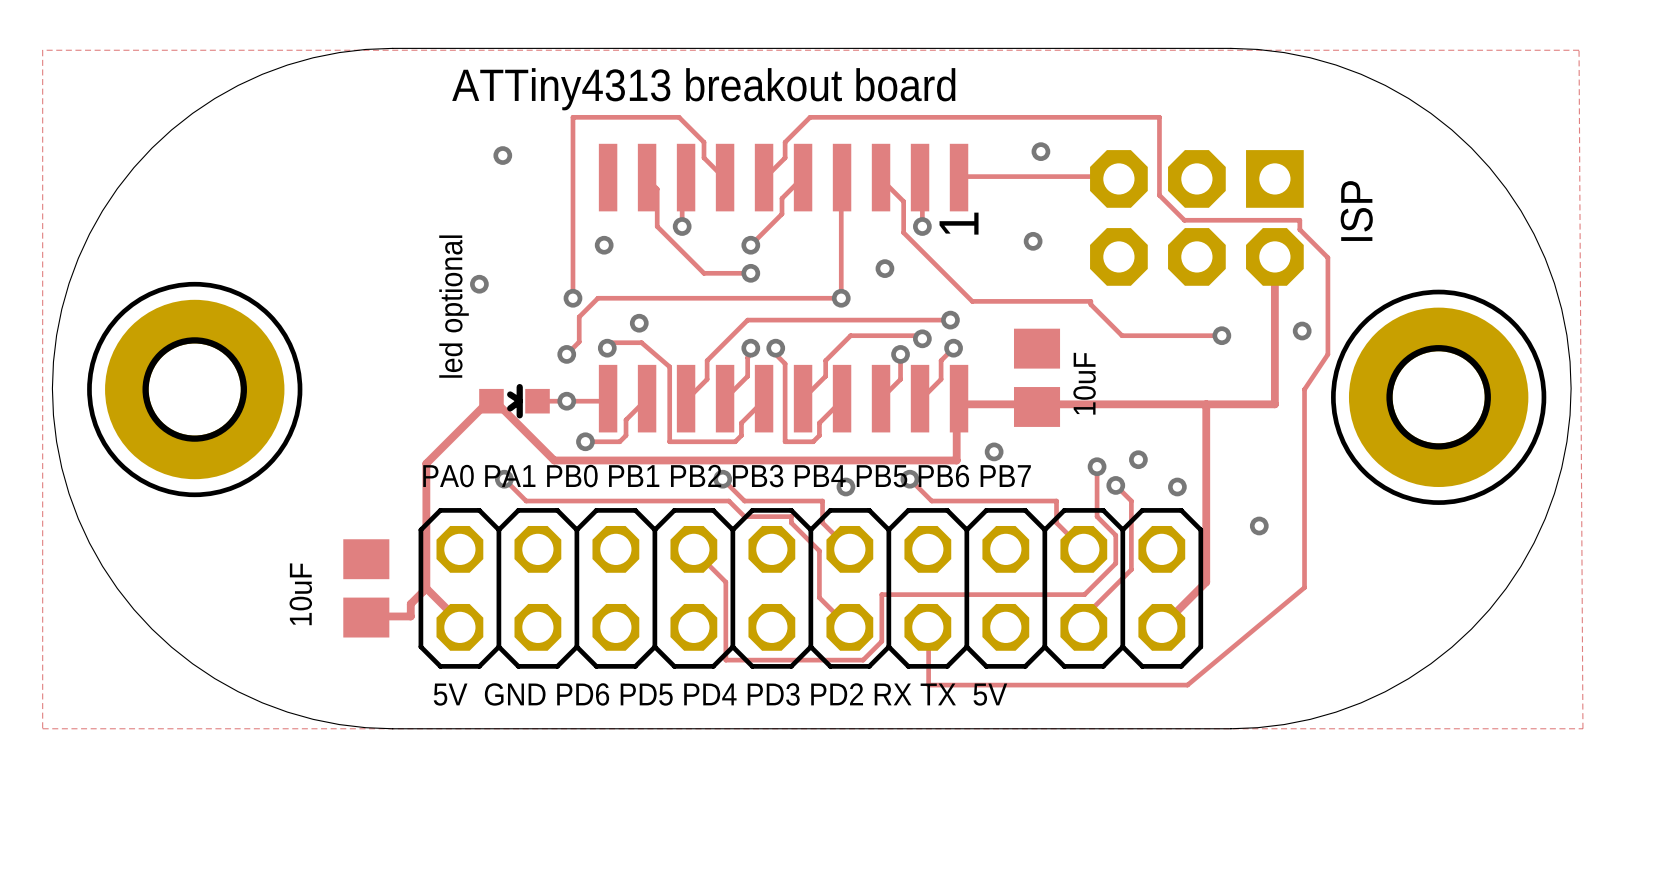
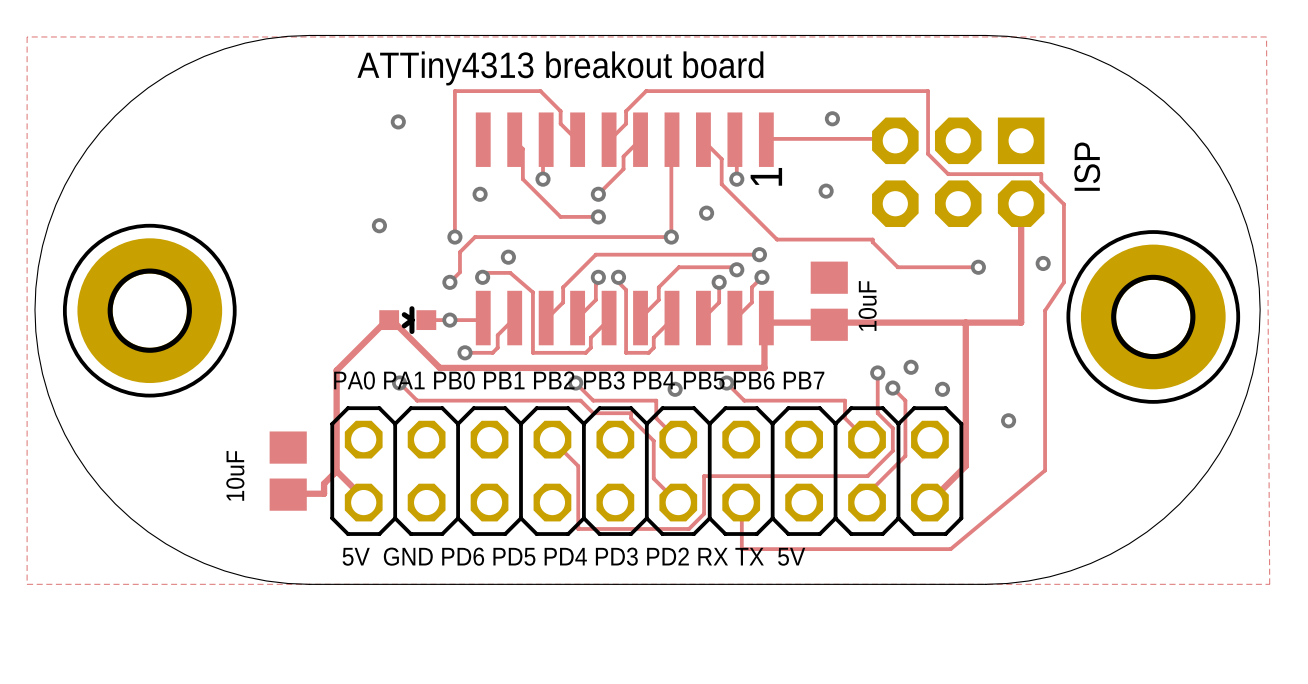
text: led optional (454, 306) -> none
via: (994, 451) -> none

